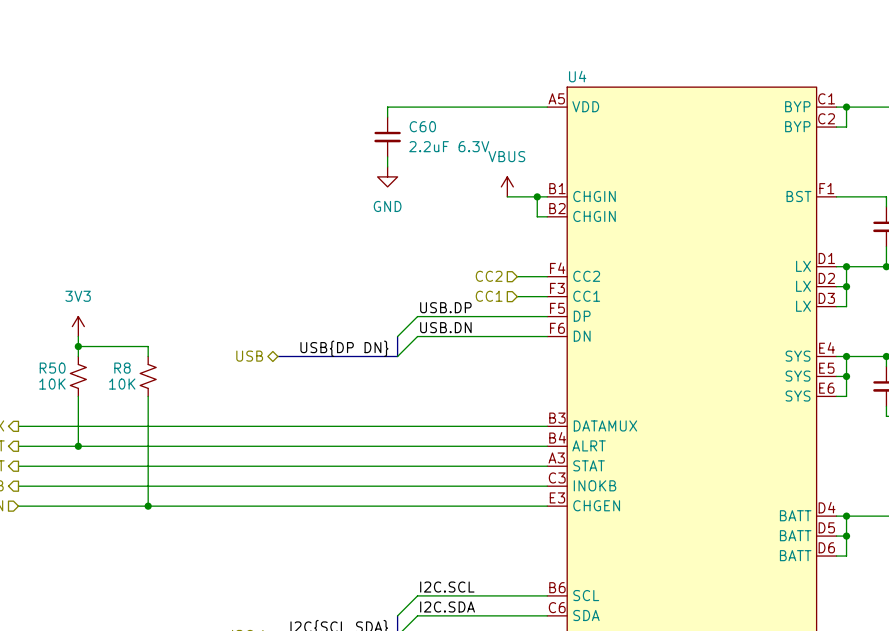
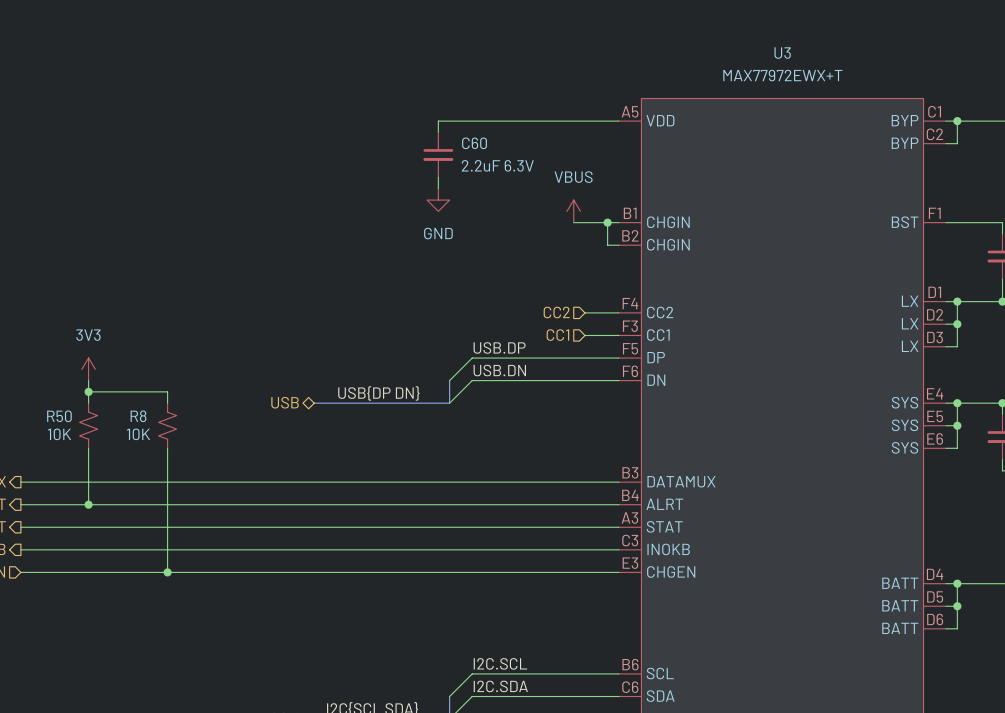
U4 value: none -> MAX77972EWX+T (782, 75)
U4 name: U4 (577, 76) -> U3 (782, 53)

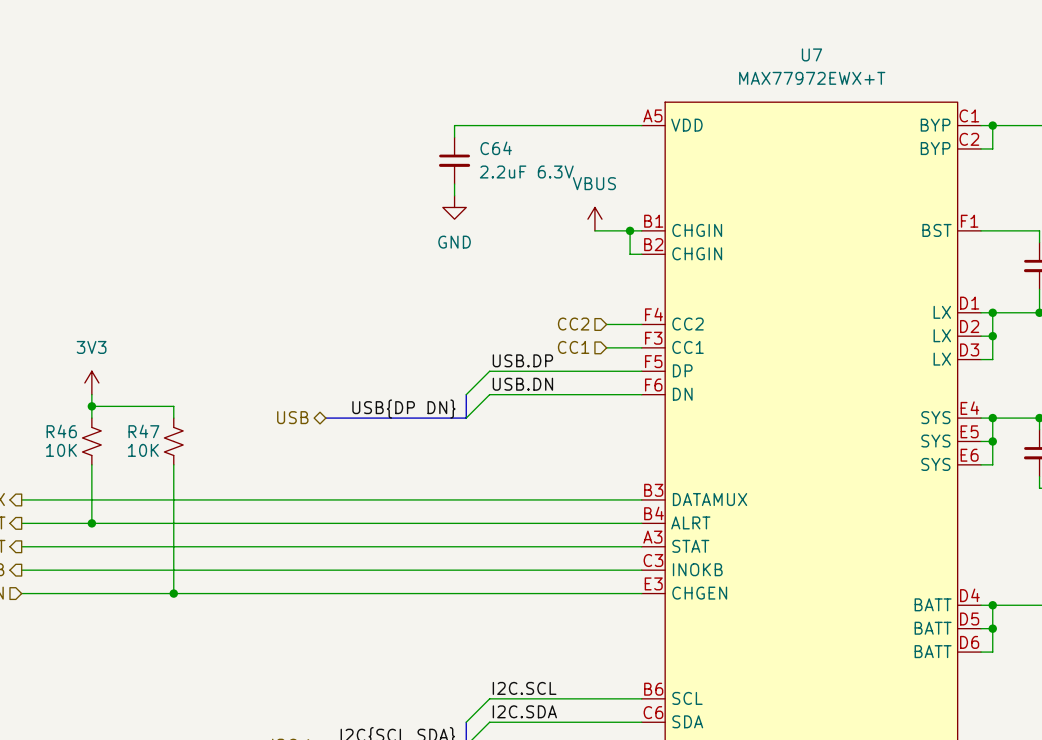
U3 name: U3 (782, 53) -> U7 (811, 54)
C60 name: C60 (474, 143) -> C64 (496, 148)
R50 name: R50 (59, 416) -> R46 (61, 431)
R8 name: R8 (138, 416) -> R47 (143, 431)

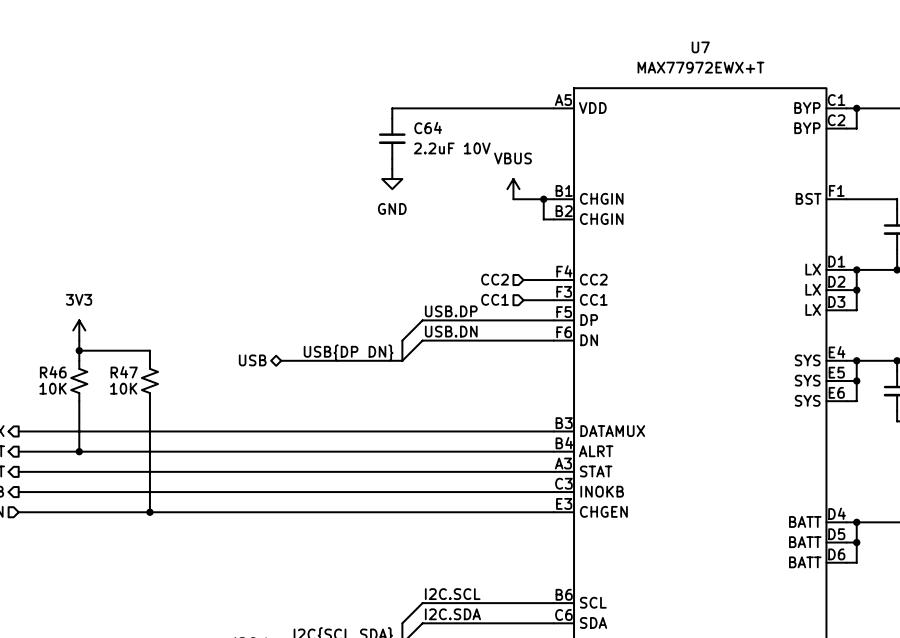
C64 value: 2.2uF 6.3V (526, 172) -> 2.2uF 10V (452, 148)

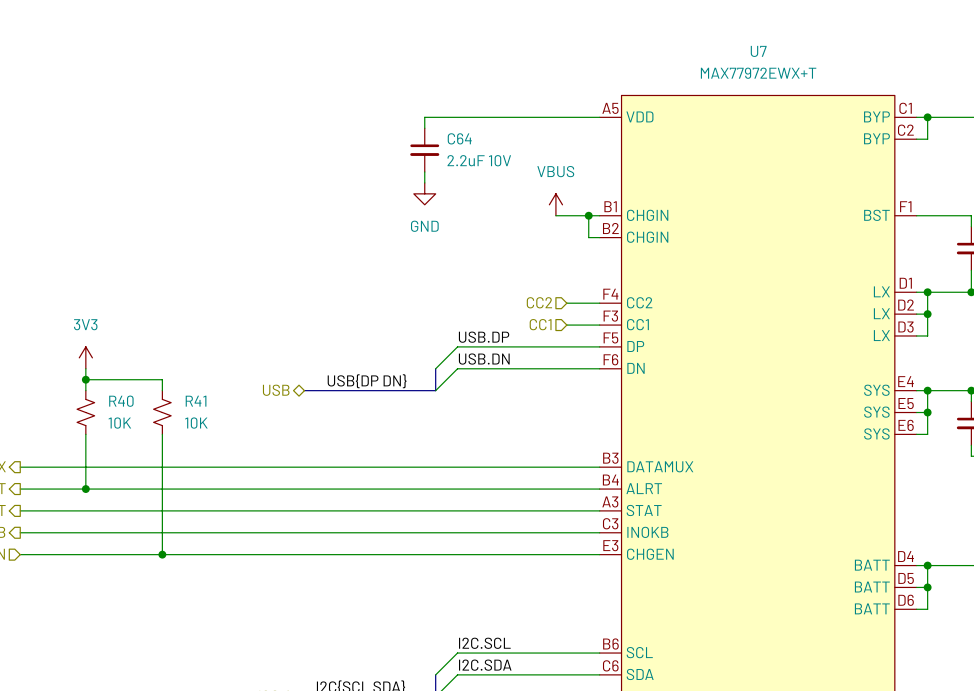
R46 name: R46 (53, 372) -> R40 (121, 401)
R47 name: R47 (124, 372) -> R41 (196, 401)
R46 value position: 10K (53, 388) -> 10K (119, 423)
R47 value position: 10K (123, 388) -> 10K (196, 423)

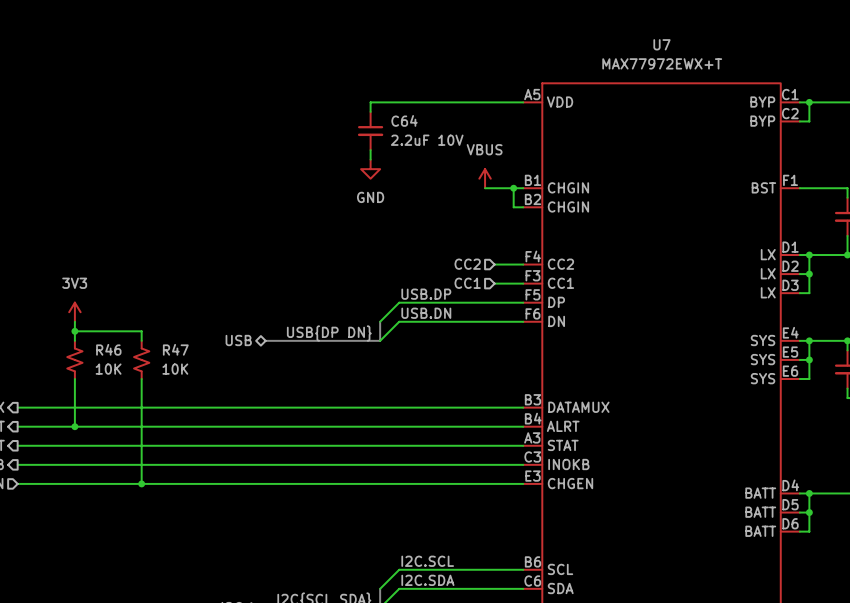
R40 name: R40 (121, 401) -> R46 (108, 349)
R41 name: R41 (196, 401) -> R47 (175, 349)

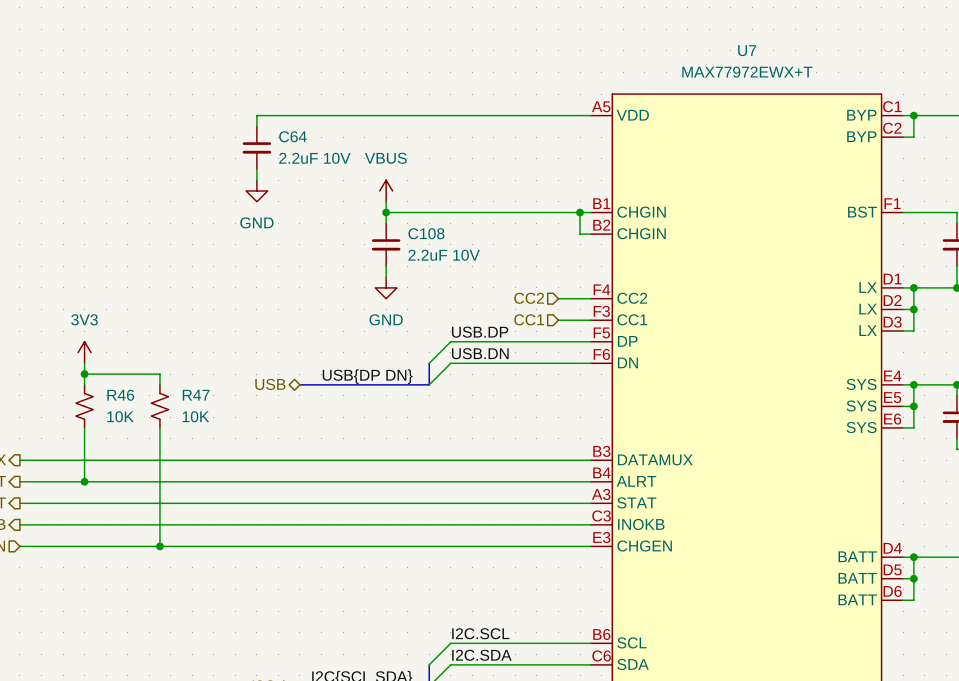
wire: (370, 102) (370, 111) -> (418, 115) (256, 115) (256, 126)
C64 position: (370, 131) -> (256, 147)
wire: none -> (256, 169) (256, 180)
wire: (370, 150) (370, 159) -> (386, 266) (386, 277)
power symbol: none -> GND (256, 190)
power symbol: GND (370, 169) -> none
wire: none -> (386, 201) (386, 223)
power symbol position: VBUS (485, 178) -> VBUS (386, 190)
wire: none -> (386, 212) (547, 212)
junction: none -> (386, 212)
C108: none -> 2.2uF 10V (386, 244)
power symbol: none -> GND (386, 287)

